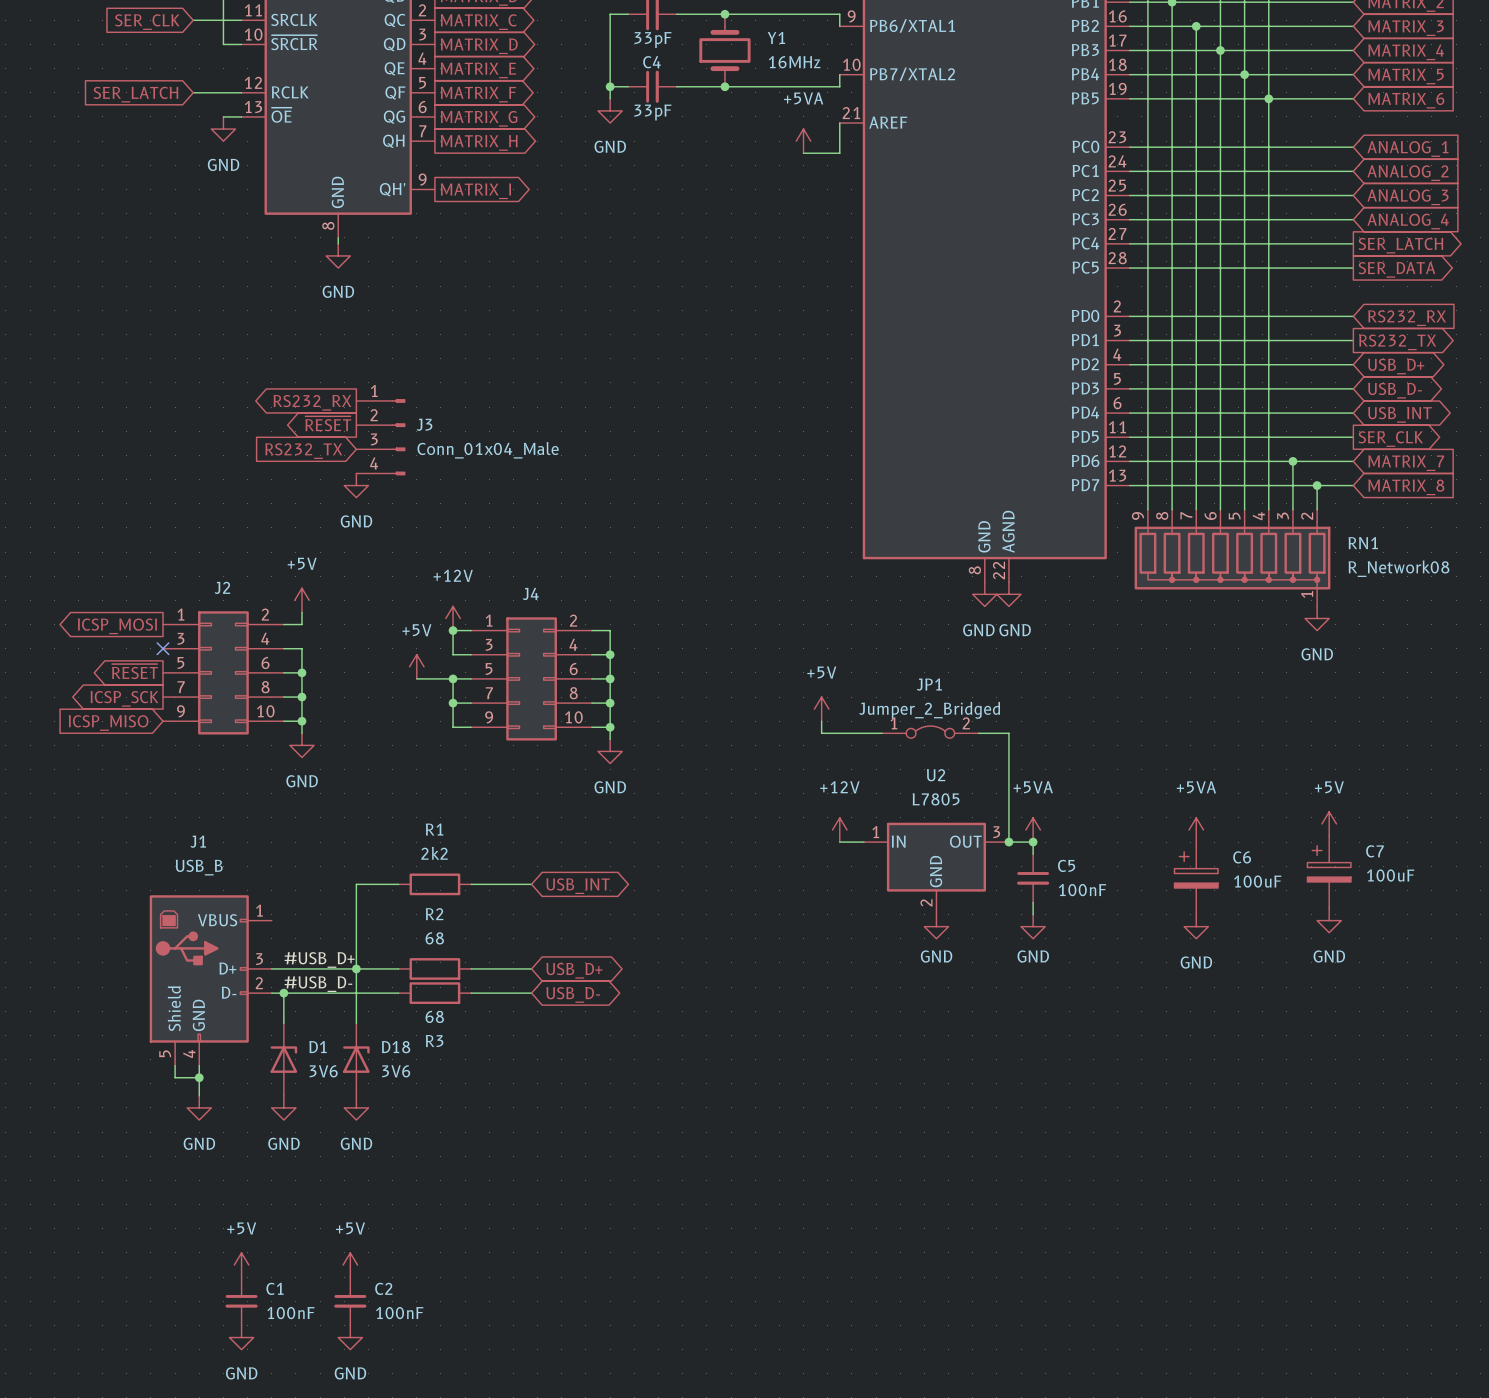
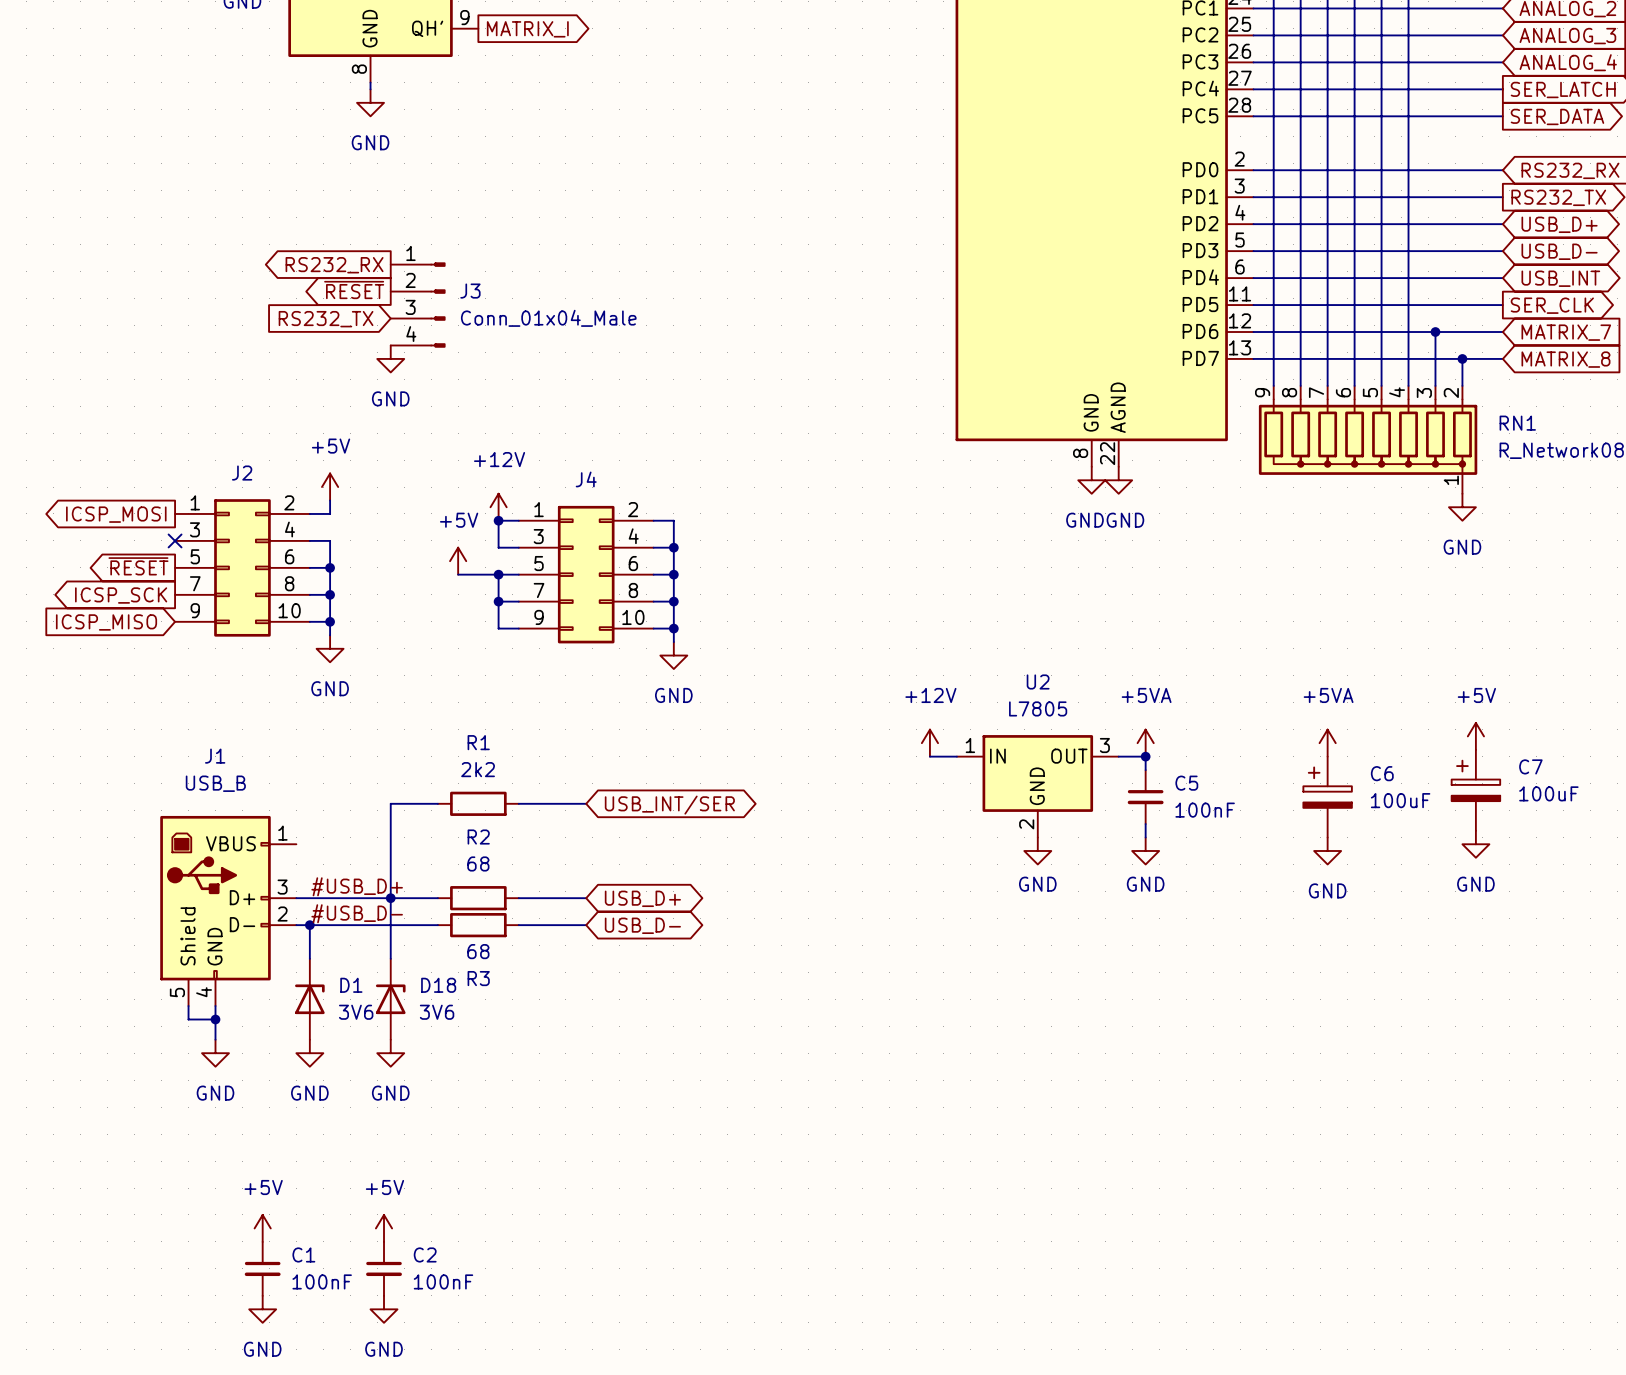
power symbol: +5V (821, 709) -> none
wire: (821, 721) (821, 733) (882, 733) -> none
JP1: Jumper_2_Bridged (930, 732) -> none
wire: (978, 733) (1008, 733) (1008, 842) -> none
junction: (1008, 842) -> none
global label: USB_INT (578, 886) -> USB_INT/SER (669, 805)

